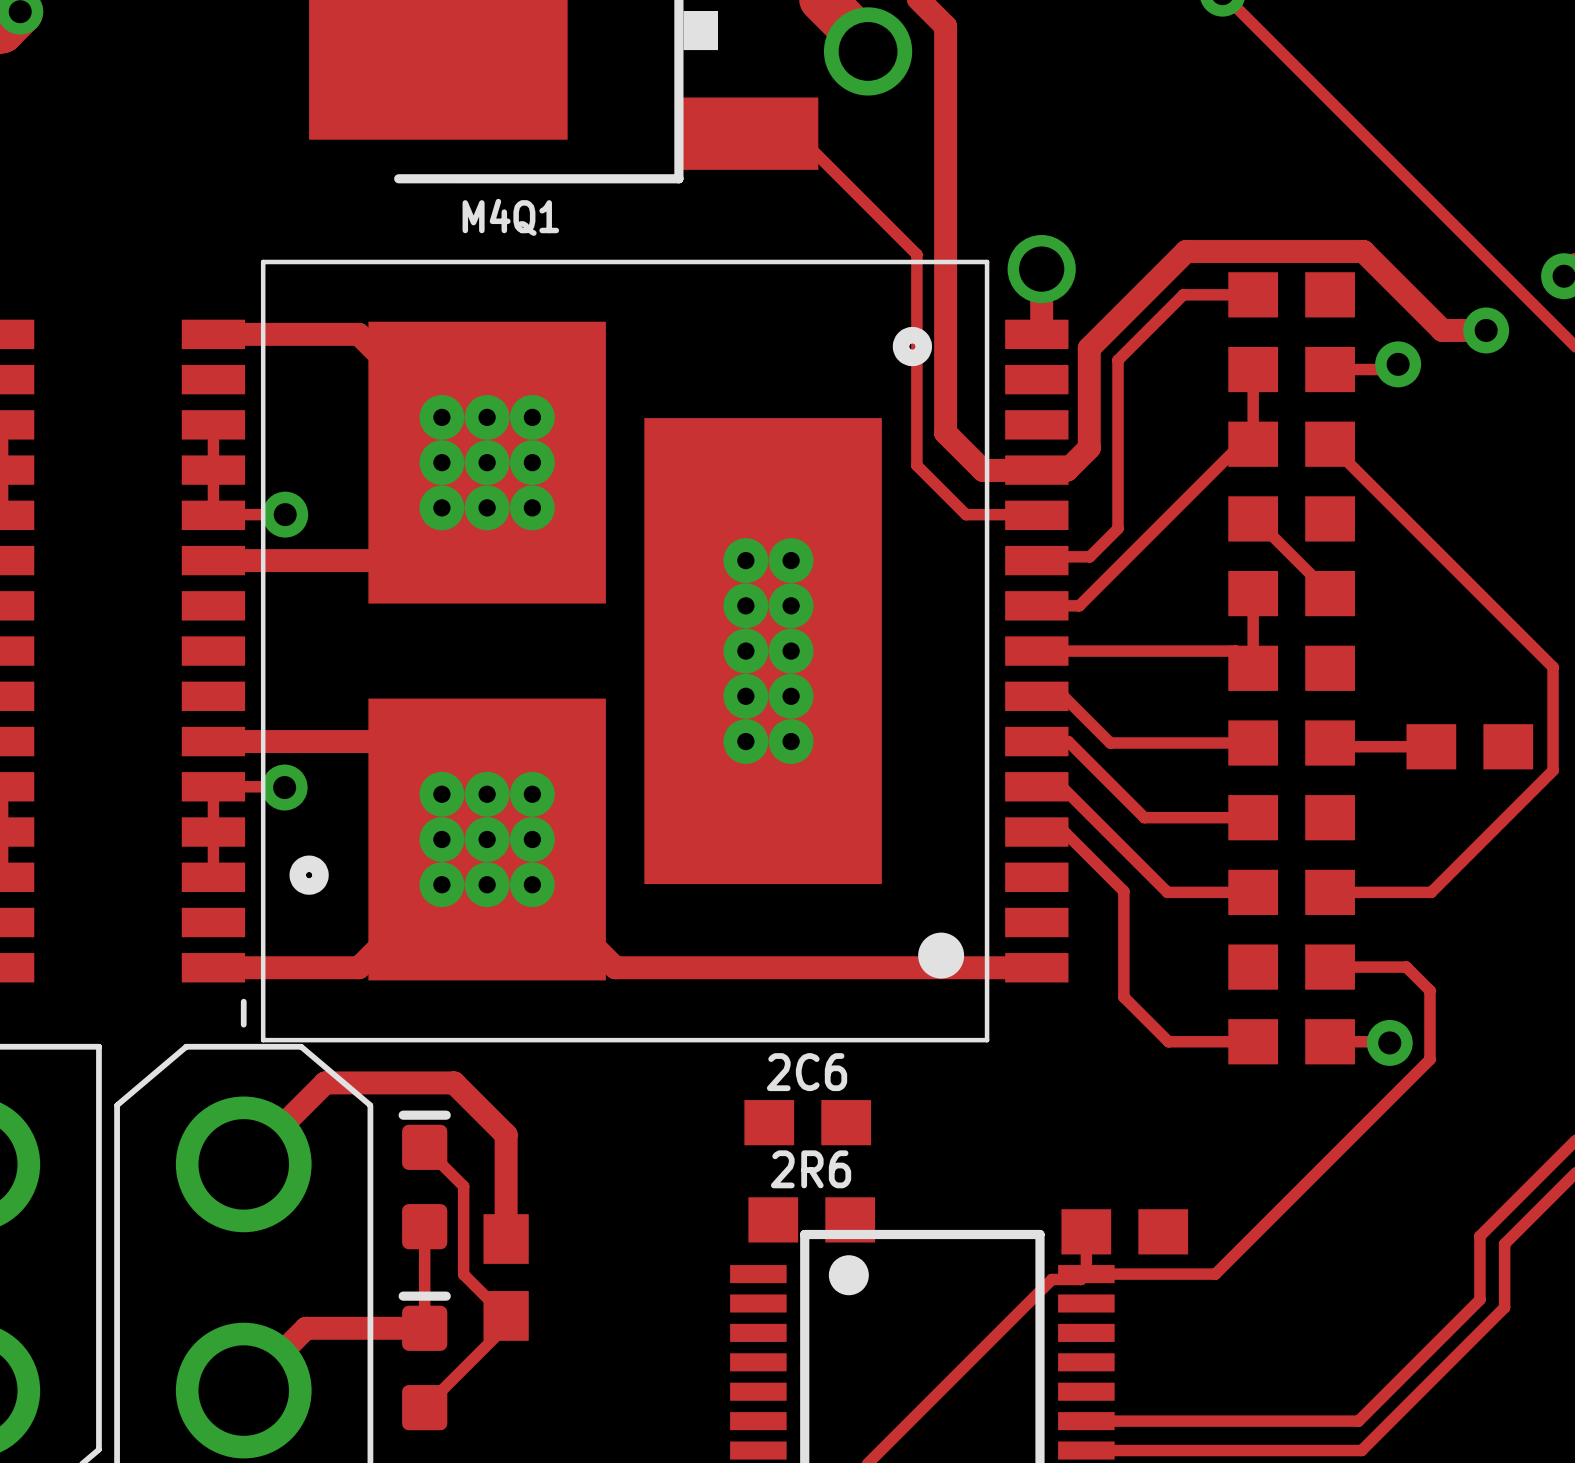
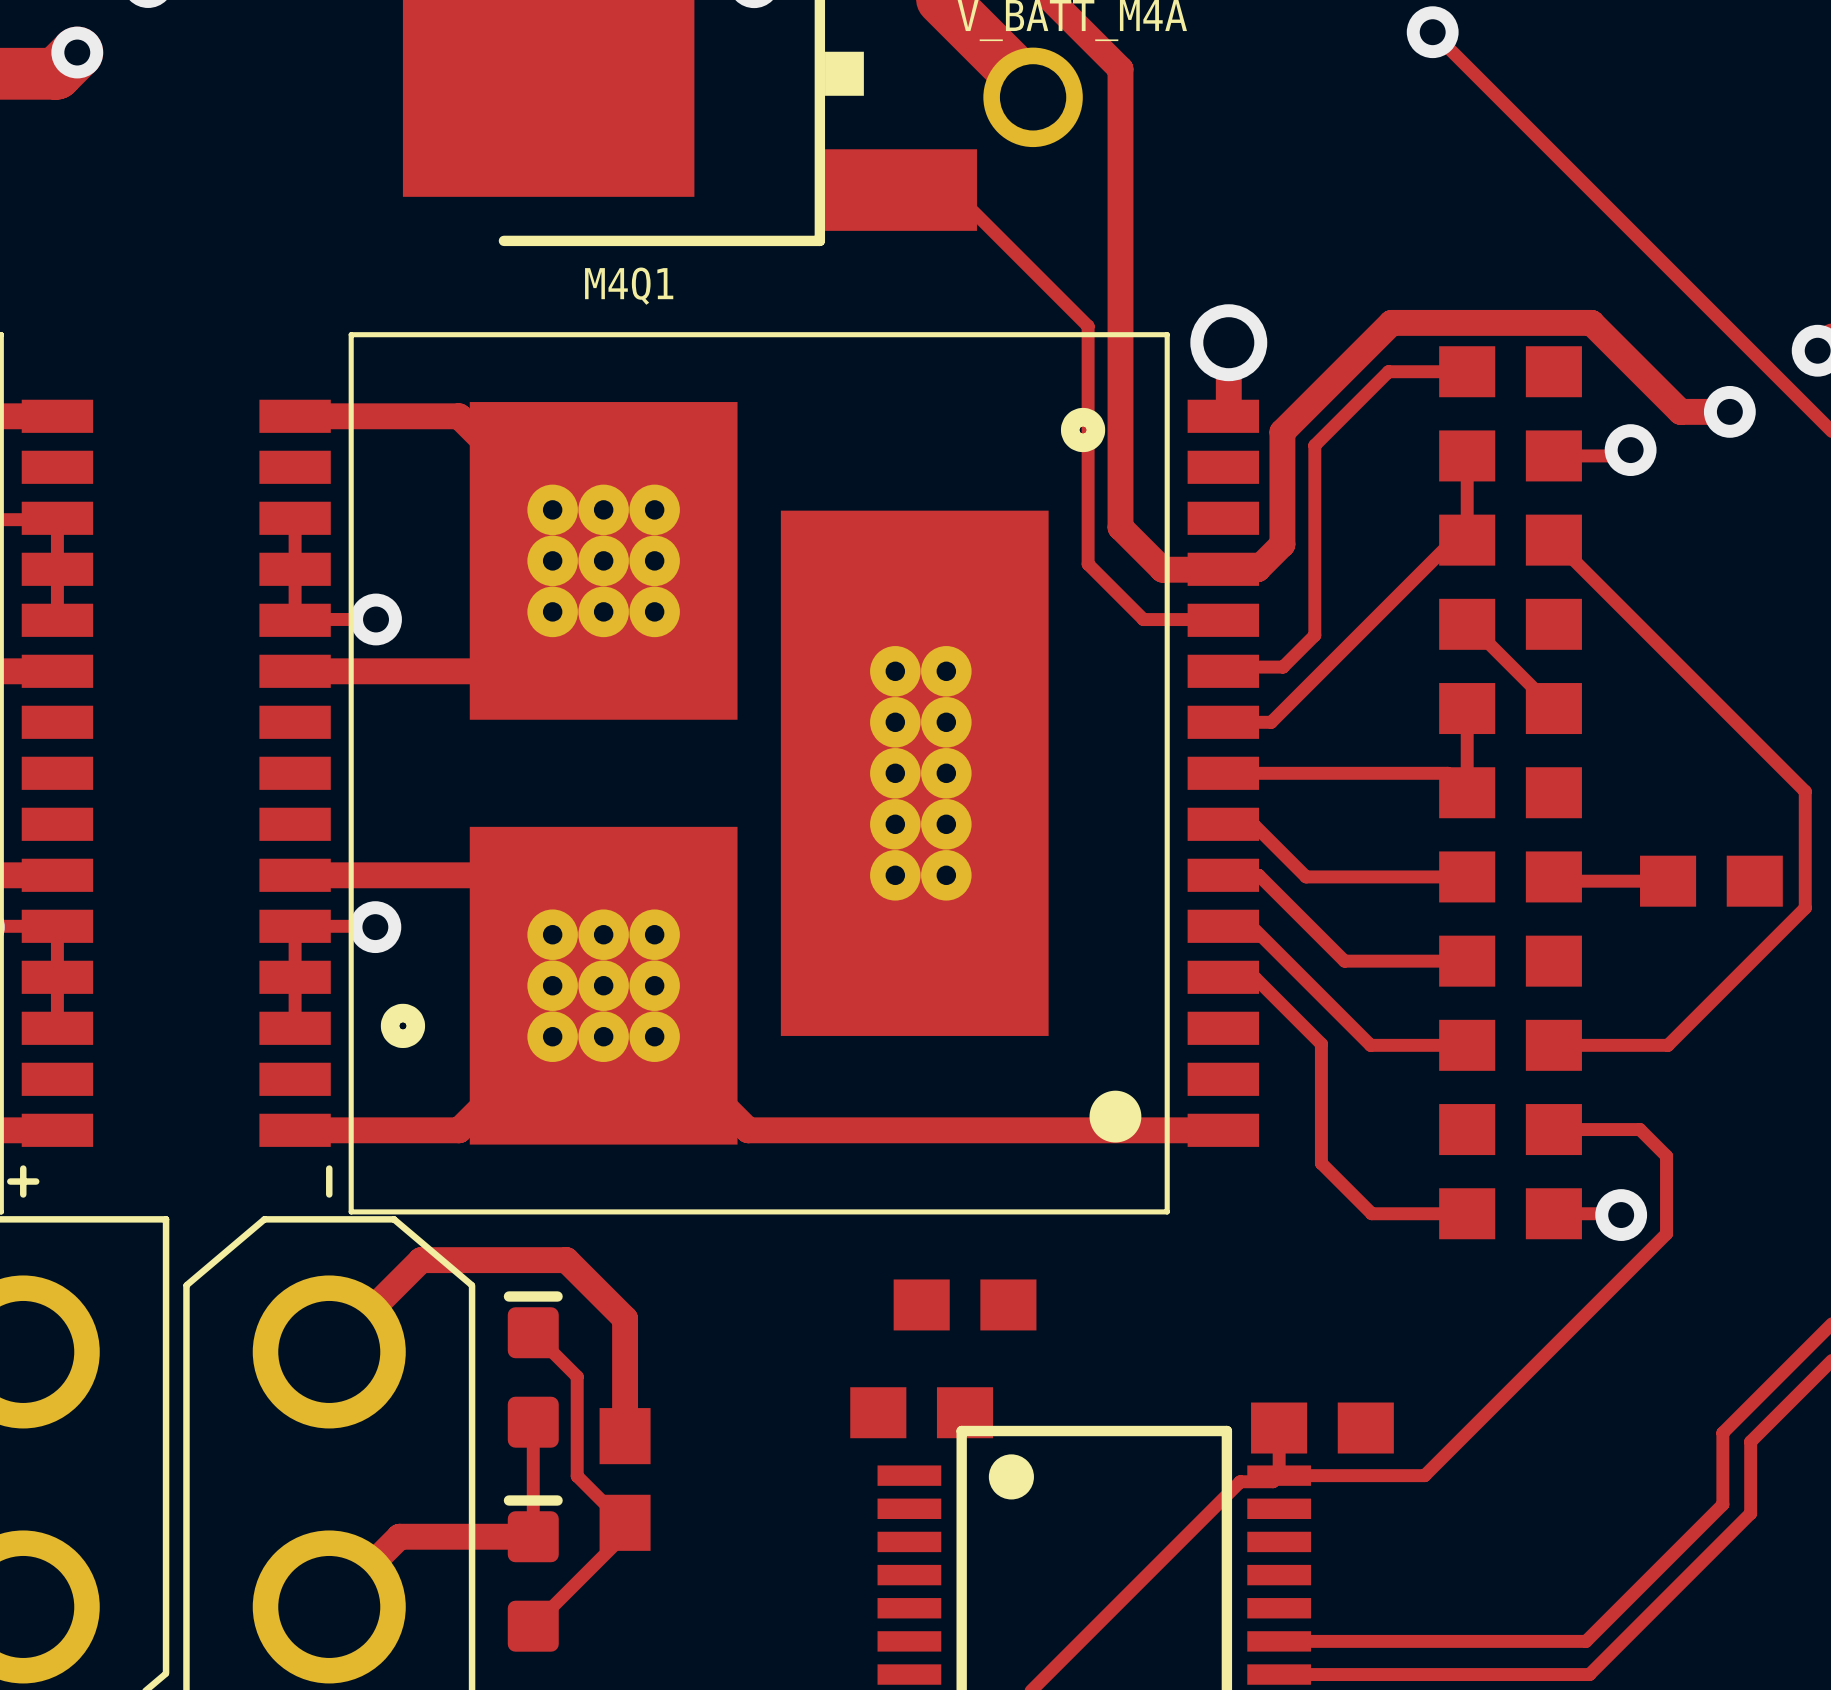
2C6 name: 2C6 (807, 1072) -> none
2R6 name: 2R6 (811, 1169) -> none
2R6 position: (811, 1219) -> (921, 1412)

